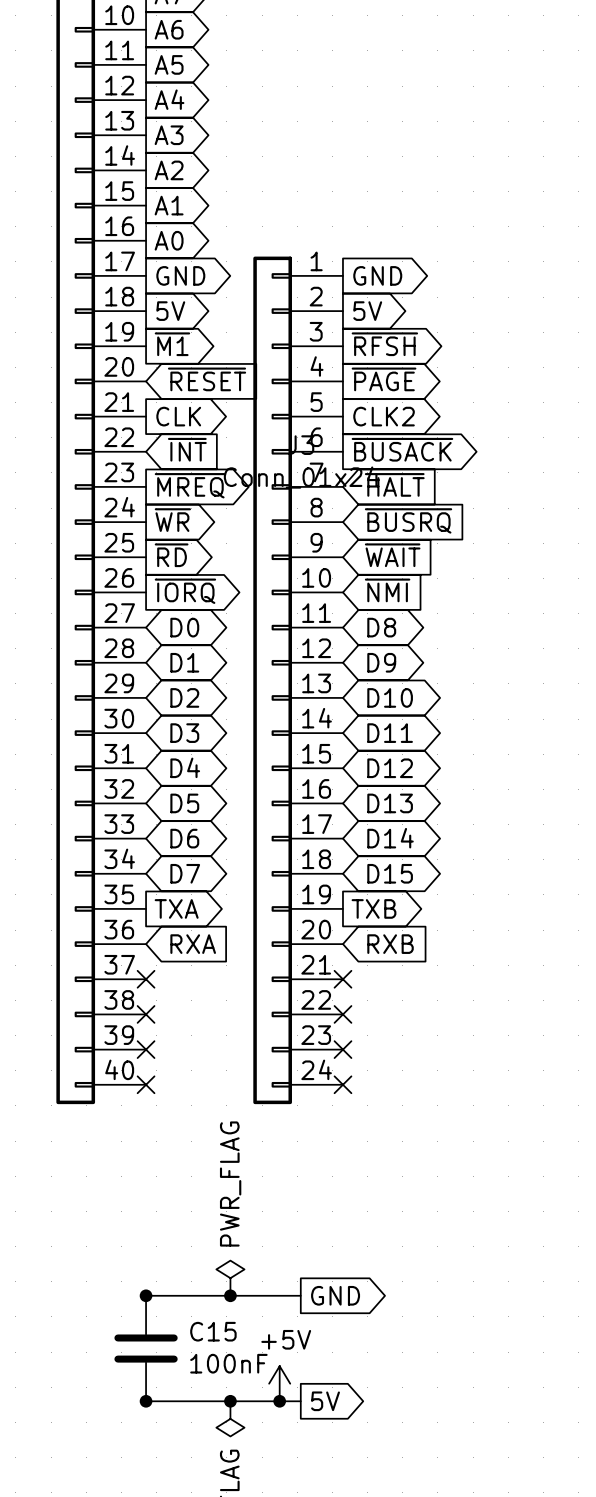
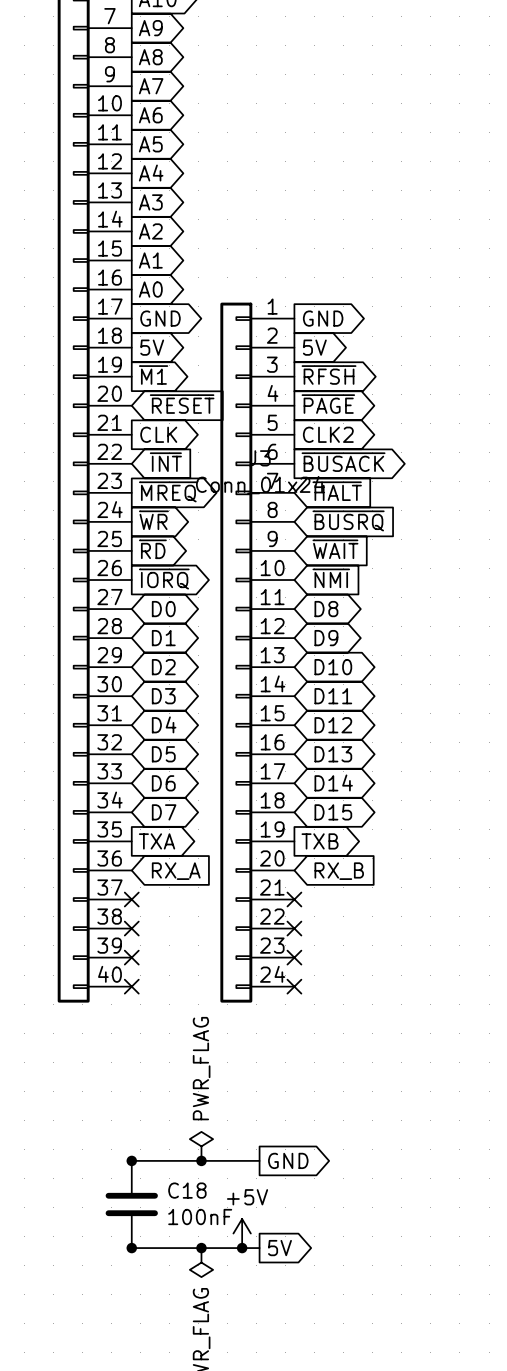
global label: RXA (193, 944) -> RX_A (176, 871)
global label: RXB (390, 944) -> RX_B (339, 871)
C15 name: C15 (213, 1331) -> C18 (187, 1190)

